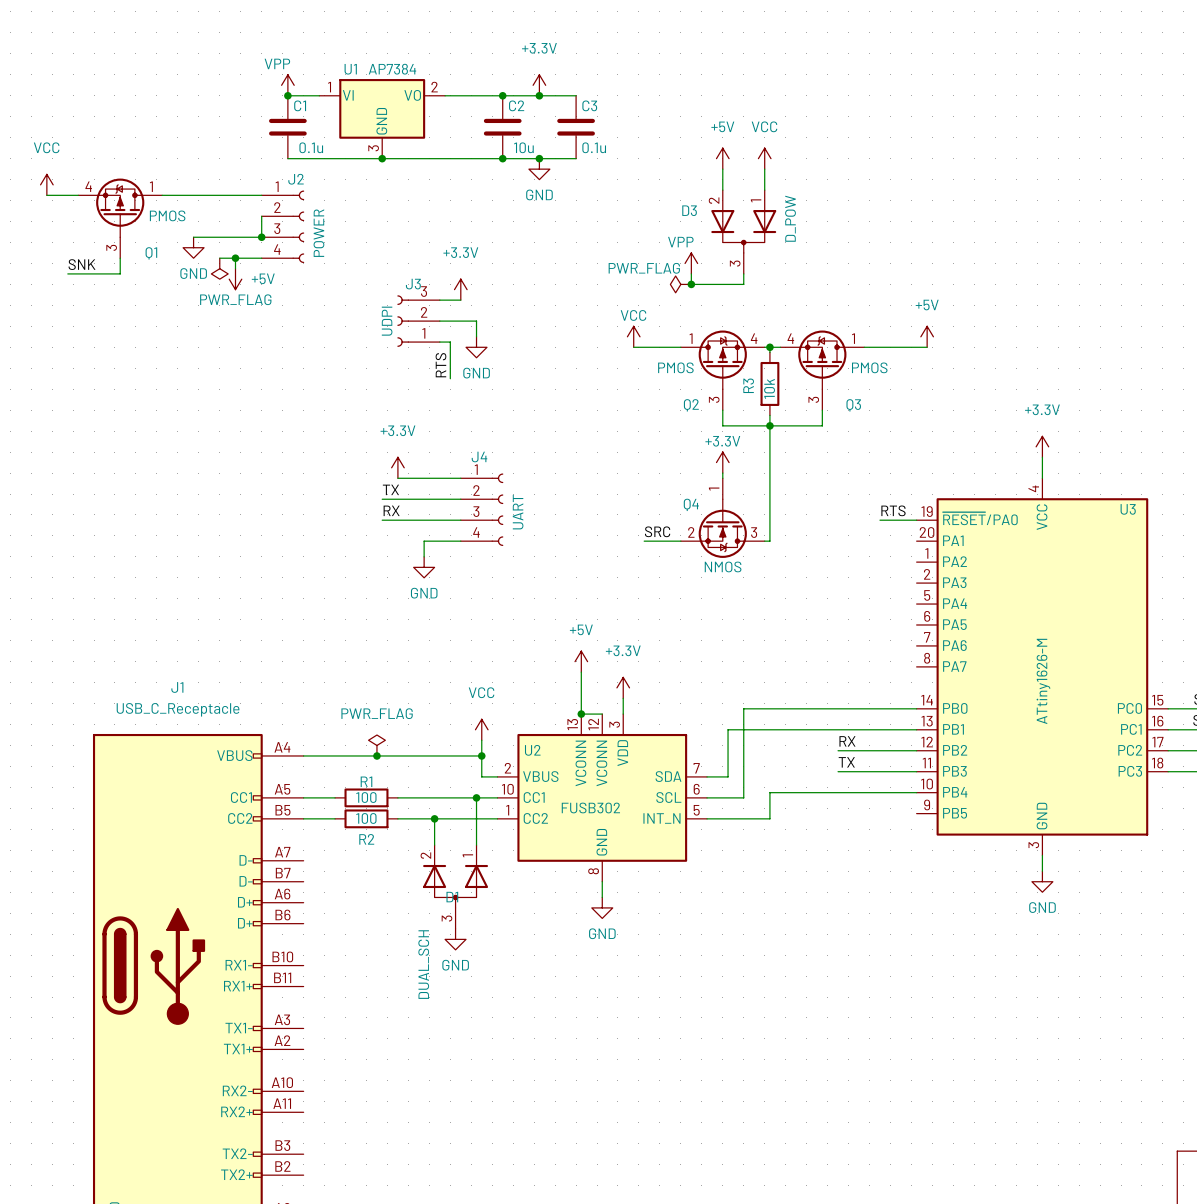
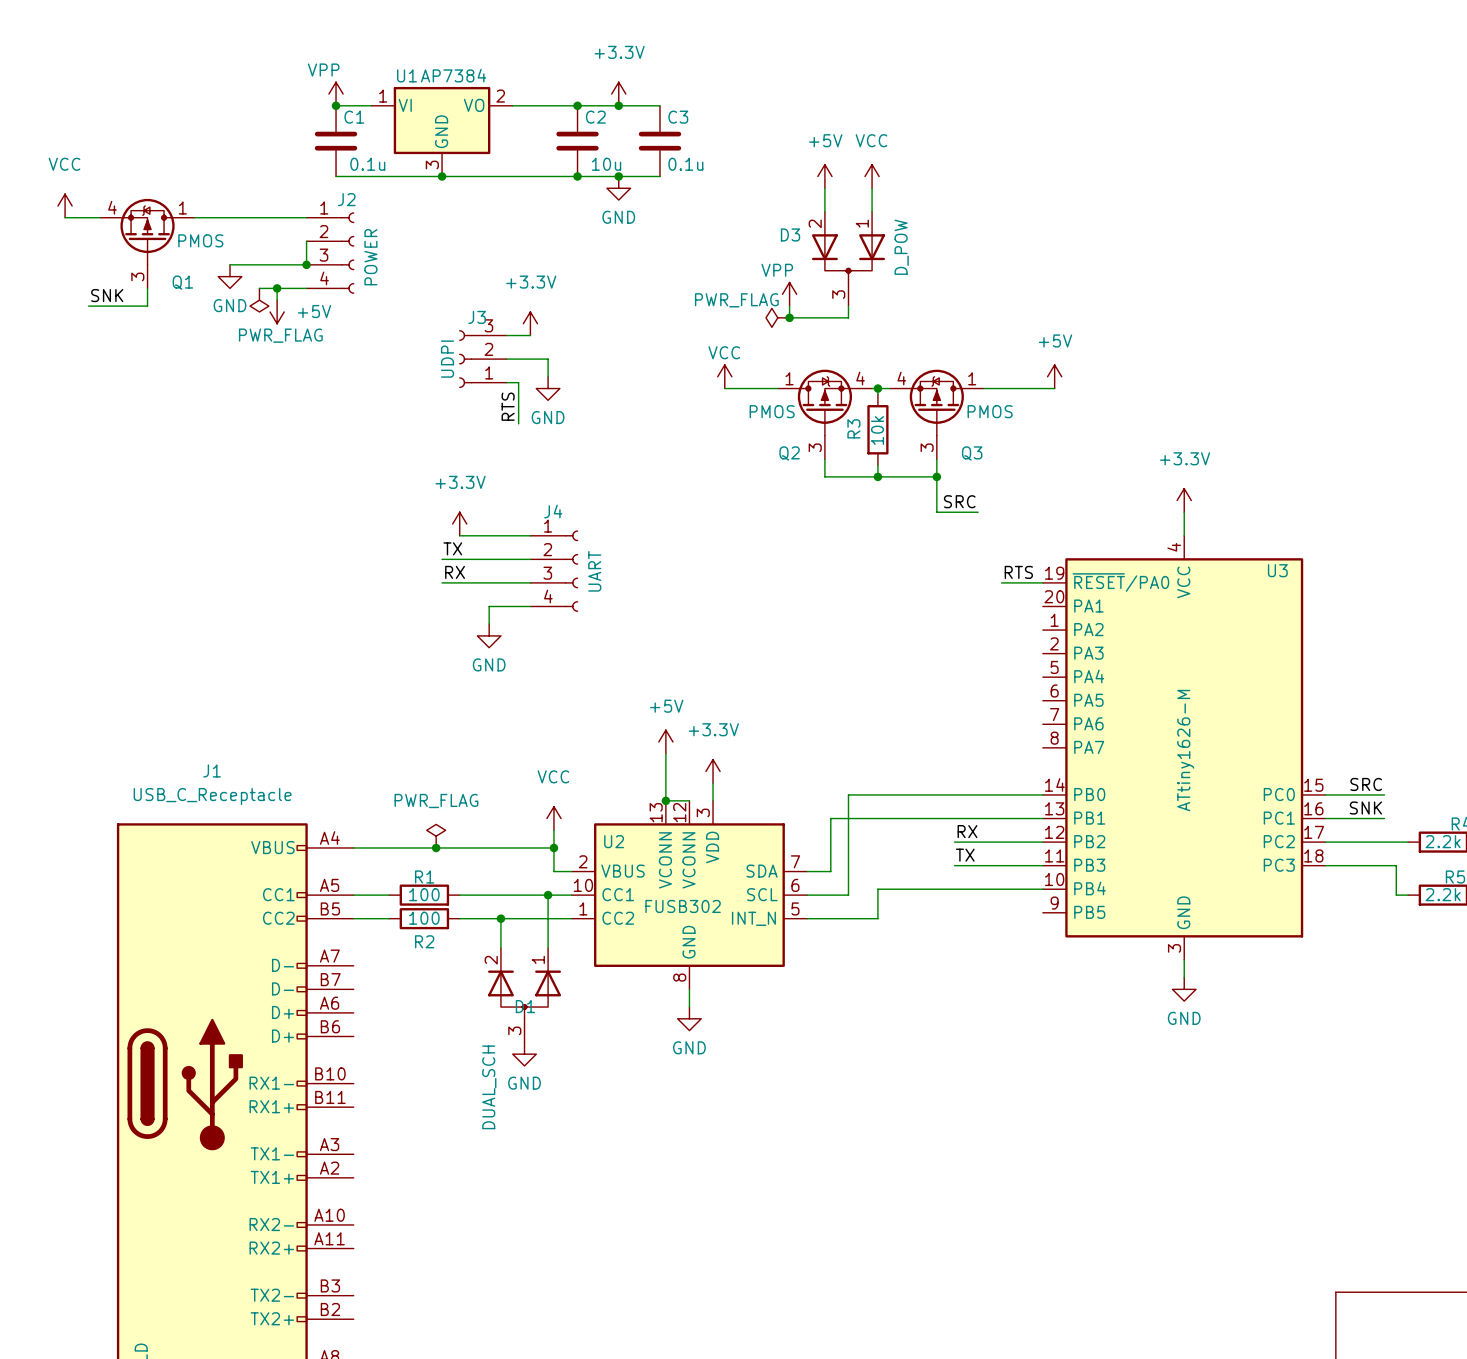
wire: (769, 425) (769, 541) (764, 541) -> none
wire: none -> (936, 476) (936, 512) (978, 512)
junction: none -> (936, 476)
label: none -> SRC (959, 501)
power symbol: +3.3V (722, 462) -> none
wire: (722, 473) (722, 478) -> none
Q4: NMOS (722, 518) -> none
label: SRC (657, 531) -> none
wire: (644, 541) (680, 541) -> none

